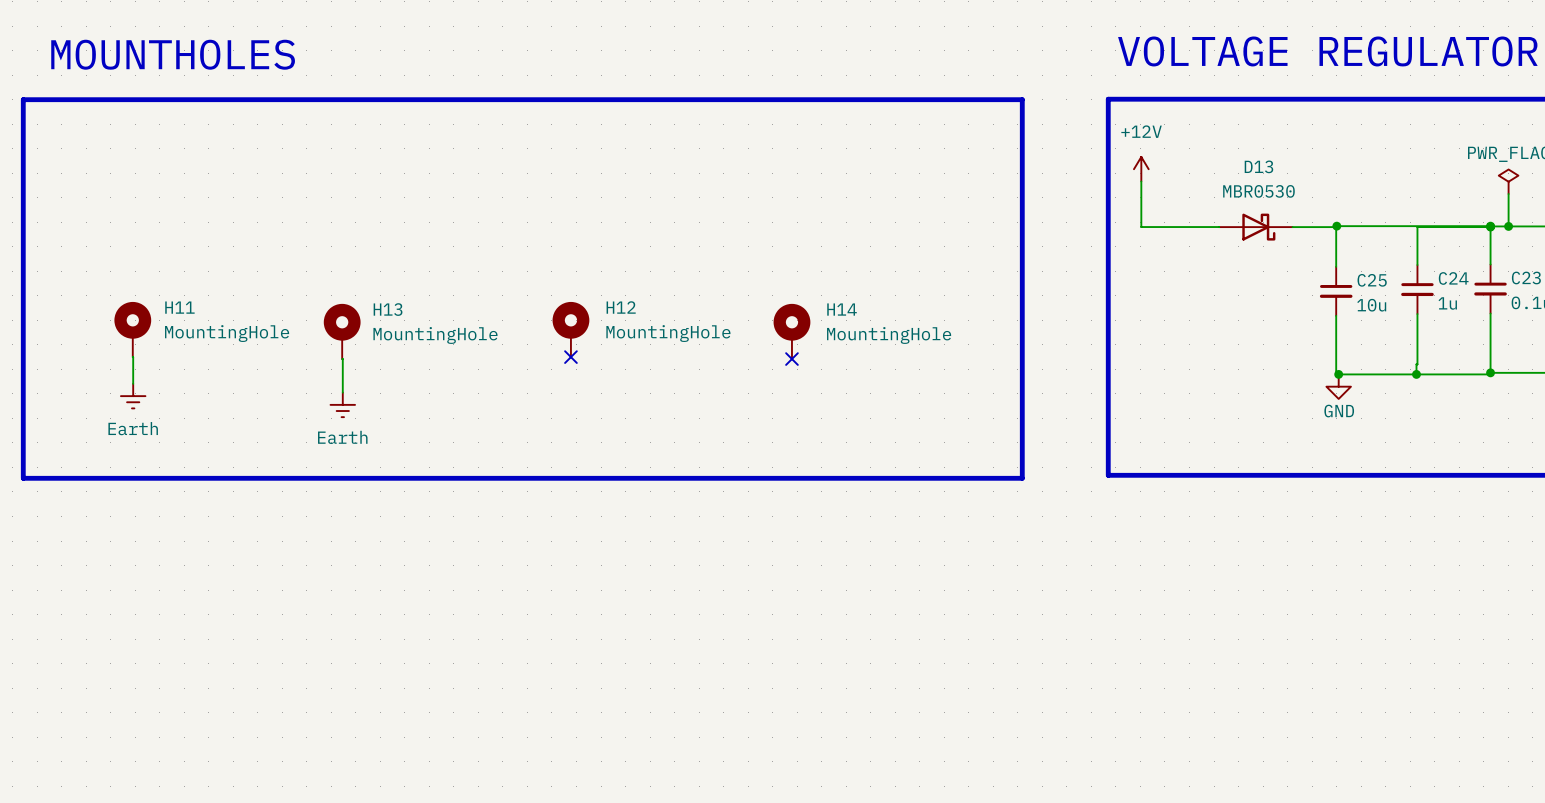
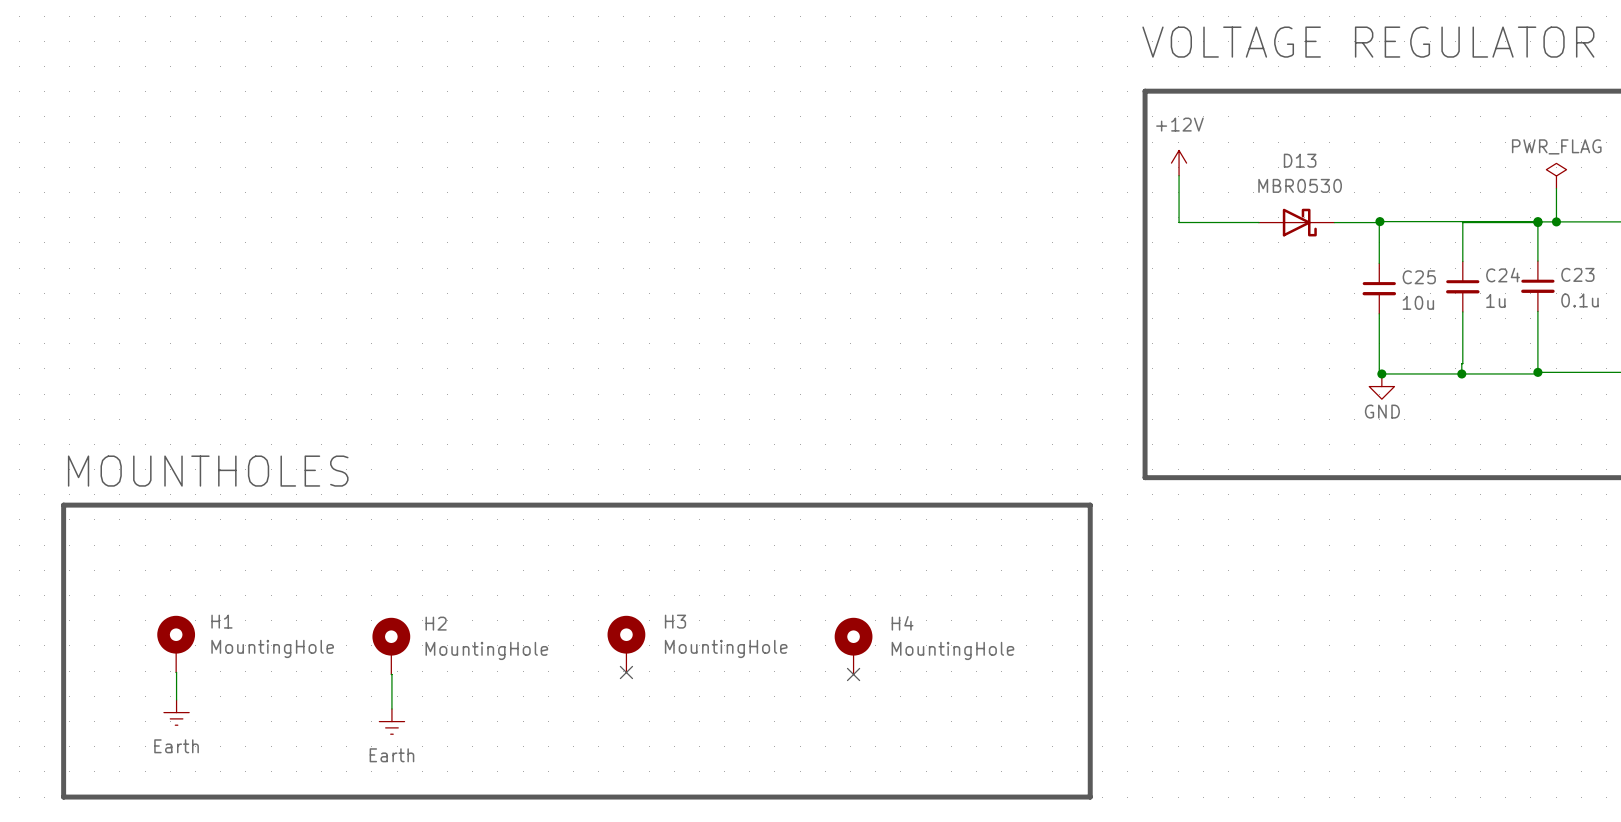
text: MOUNTHOLES (173, 54) -> none
line: (23, 99) (1022, 99) (1022, 478) (23, 478) (23, 99) -> none
H11: MountingHole (132, 329) -> none
H12: MountingHole (570, 329) -> none
H13: MountingHole (342, 331) -> none
H14: MountingHole (791, 331) -> none
wire: (132, 357) (133, 383) -> none
no-connect mark: (570, 357) -> none
wire: (342, 359) (342, 392) -> none
no-connect mark: (791, 359) -> none
power symbol: Earth (133, 396) -> none
power symbol: Earth (342, 404) -> none
text: none -> MOUNTHOLES (208, 471)
line: none -> (63, 505) (1090, 505) (1090, 797) (63, 797) (63, 505)
H1: none -> MountingHole (176, 644)
H3: none -> MountingHole (626, 644)
H2: none -> MountingHole (391, 646)
H4: none -> MountingHole (853, 646)
wire: none -> (176, 672) (176, 700)
no-connect mark: none -> (626, 672)
wire: none -> (391, 674) (391, 709)
no-connect mark: none -> (853, 674)
power symbol: none -> Earth (176, 712)
power symbol: none -> Earth (391, 721)

